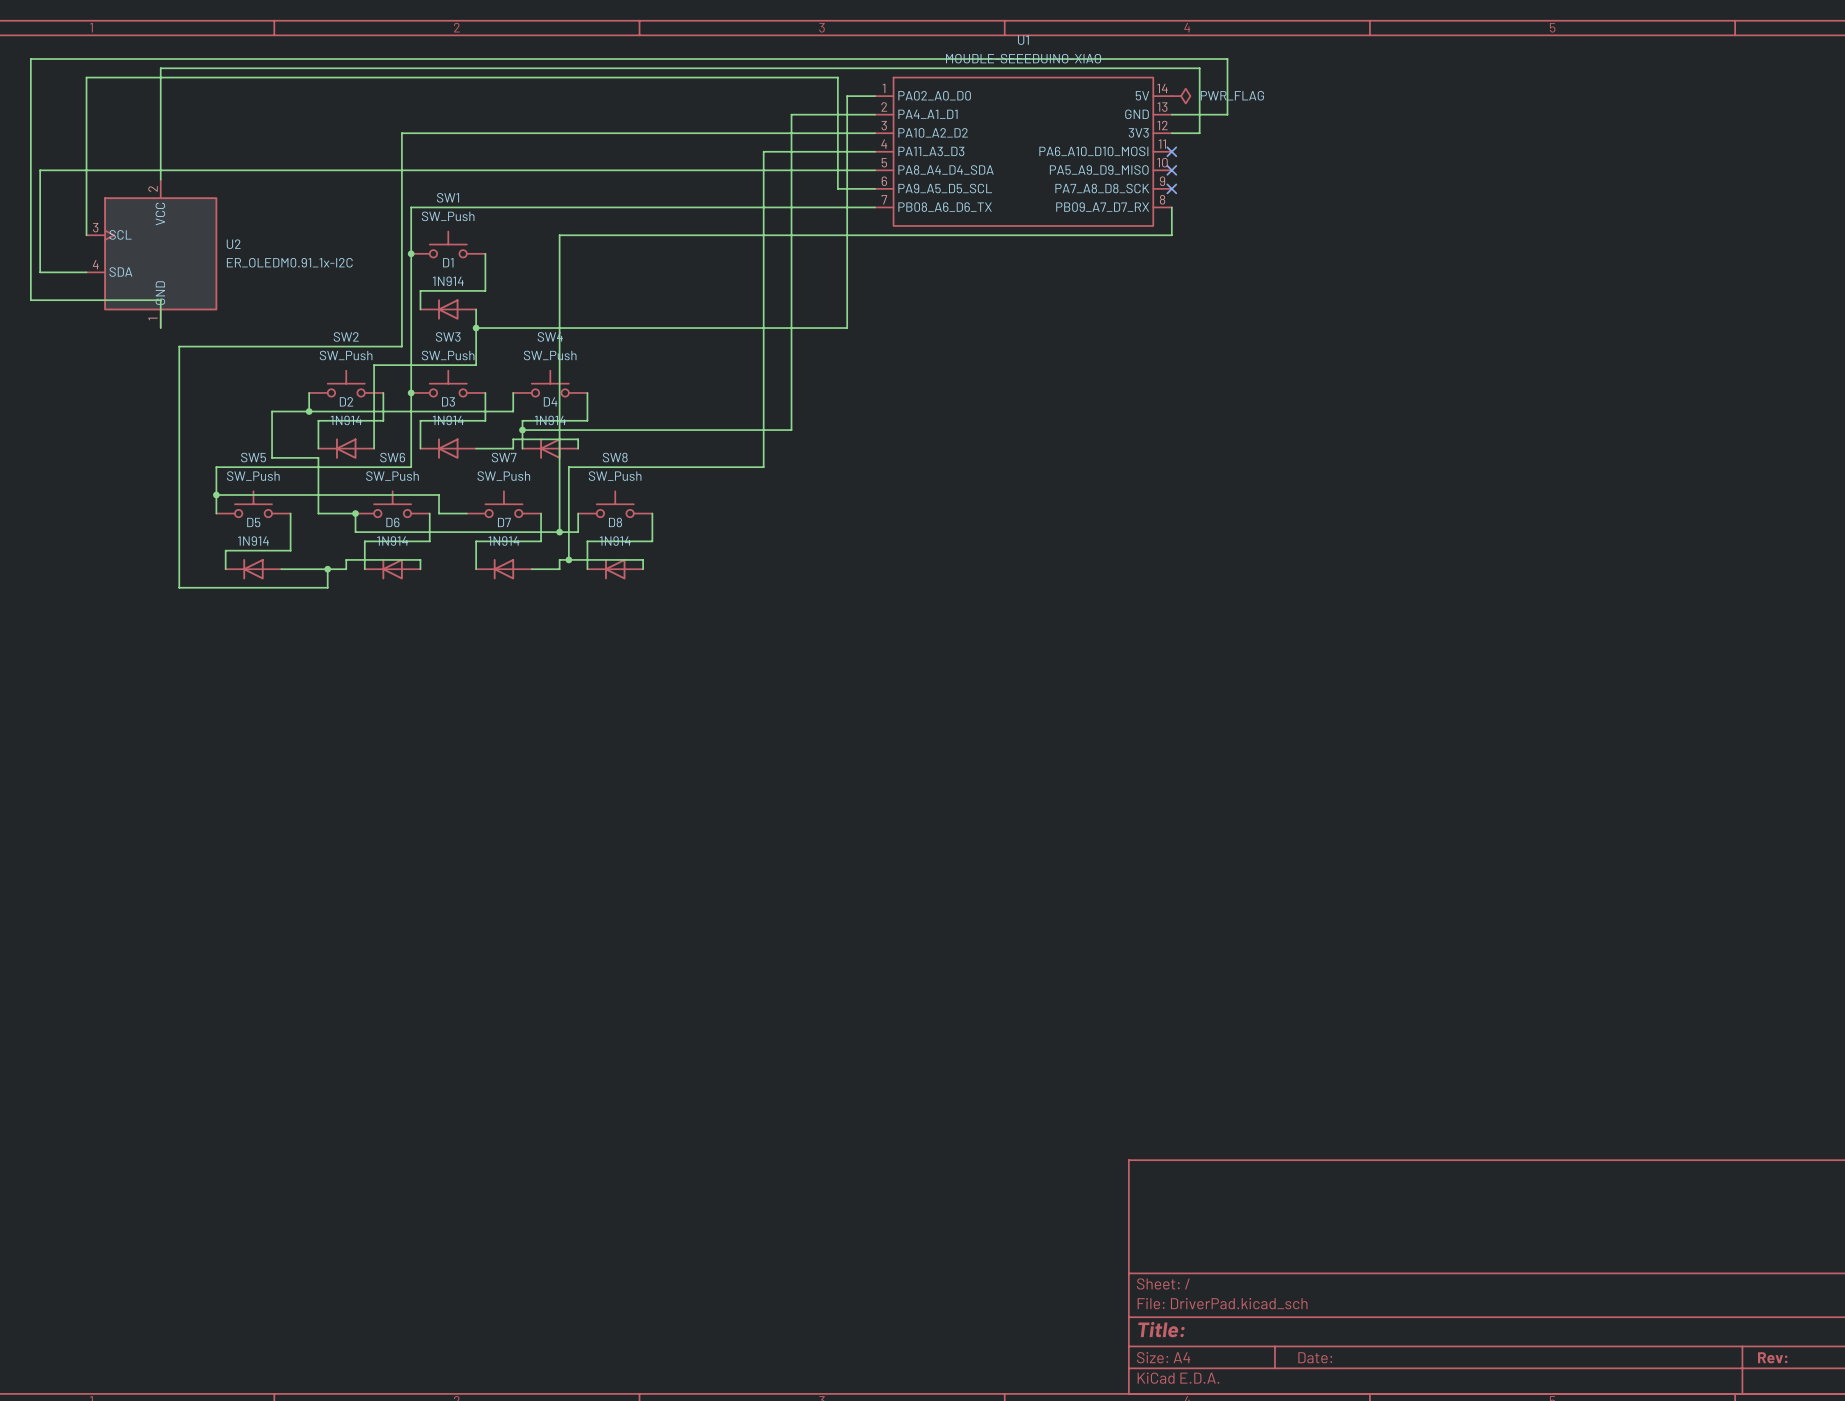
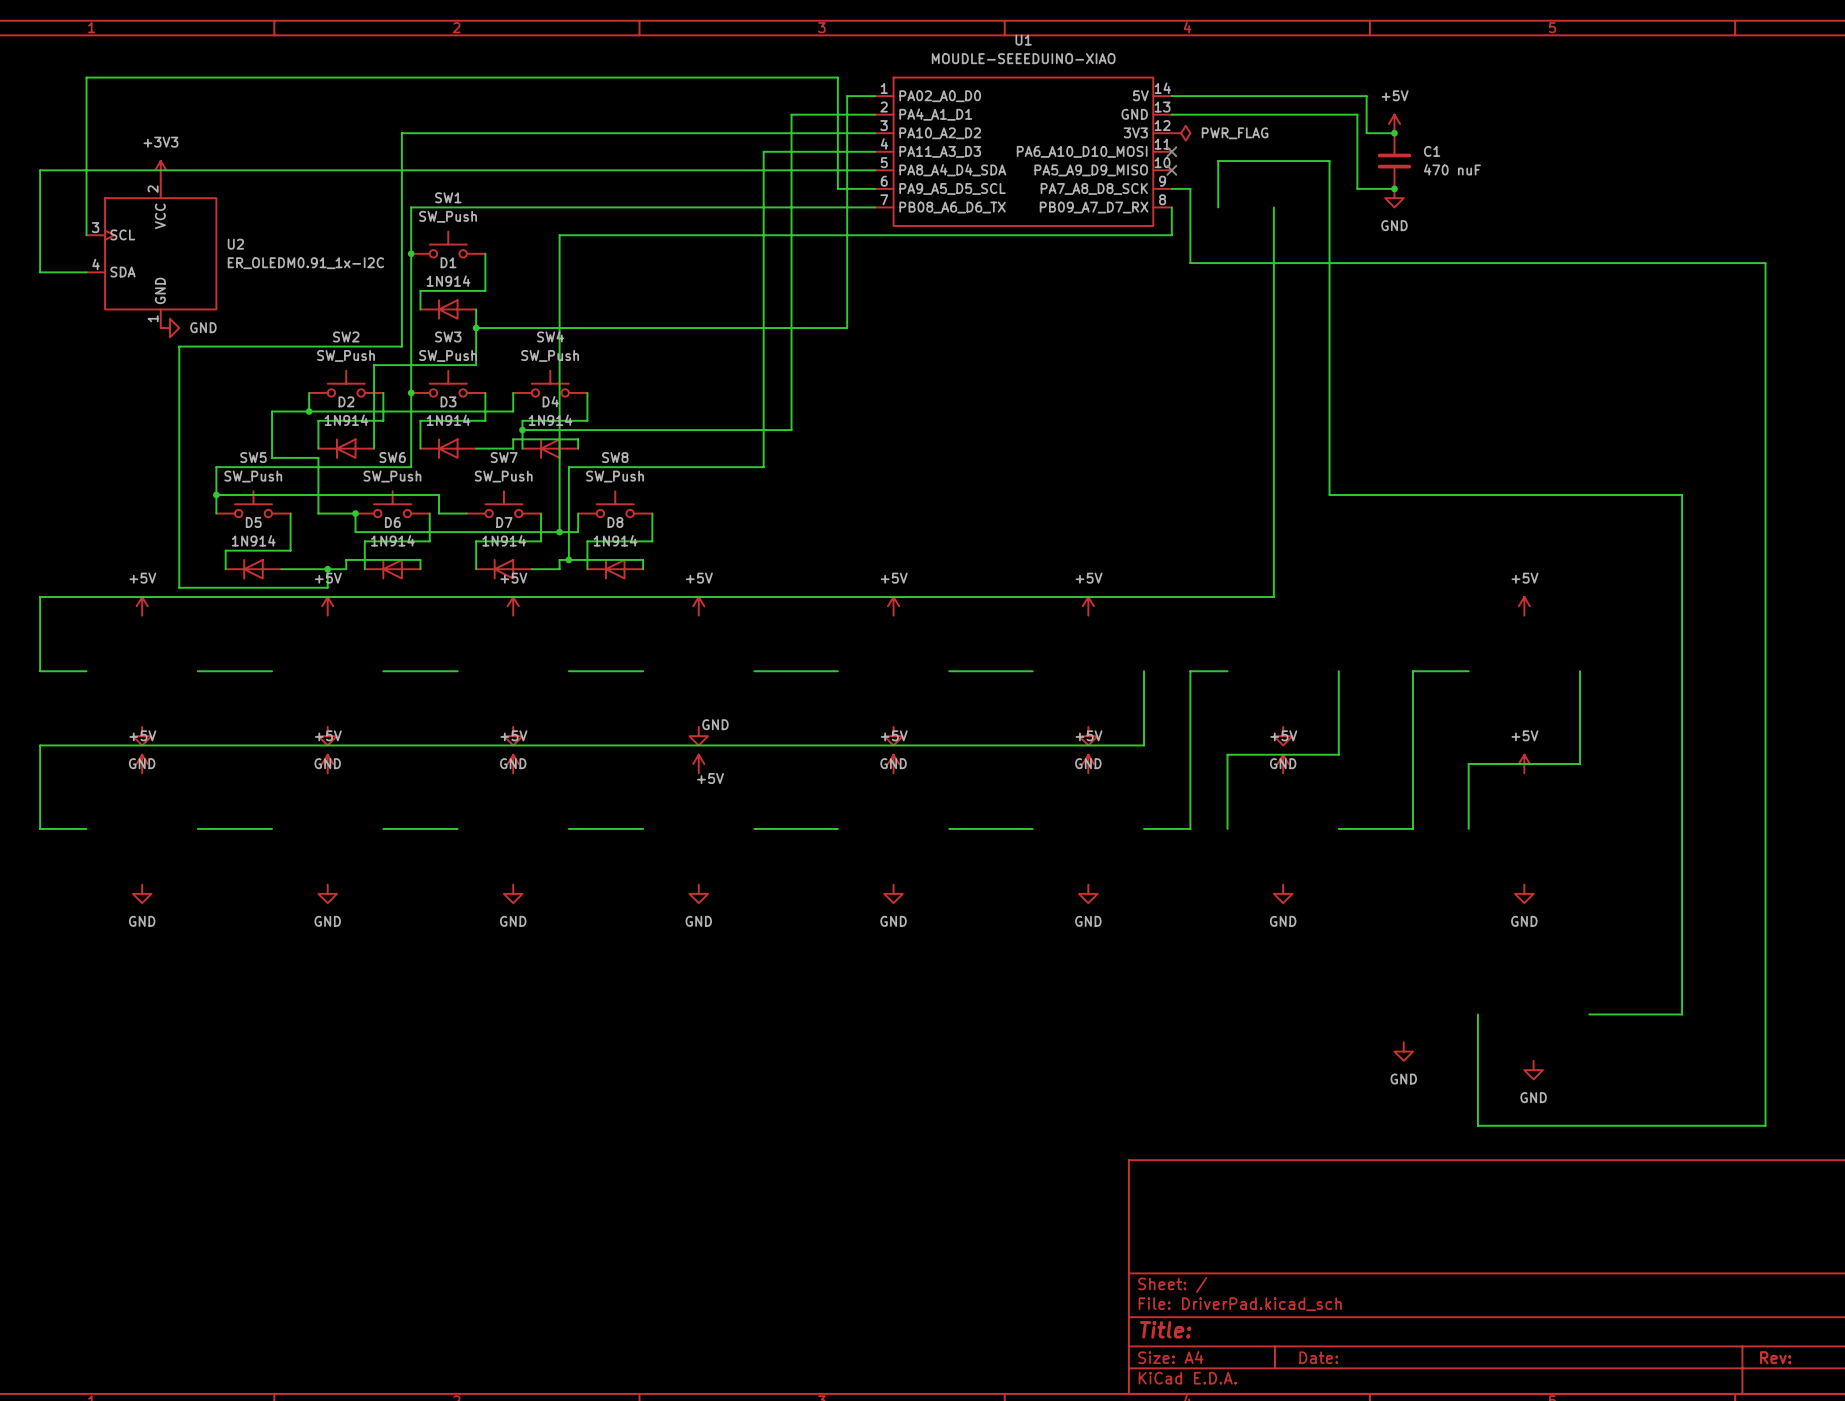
wire: none -> (1171, 96) (1366, 96) (1366, 133) (1394, 133)
power symbol position: PWR_FLAG (1181, 96) -> PWR_FLAG (1181, 133)
wire: (1227, 114) (1227, 59) (30, 59) (30, 300) (160, 300) (160, 328) -> (1227, 114) (1357, 114) (1357, 188) (1394, 188)
power symbol: none -> +5V (1394, 123)
wire: (1171, 133) (1199, 133) (1199, 68) (160, 68) (160, 179) -> none
junction: none -> (1394, 133)
C1: none -> 470 nuF (1394, 161)
power symbol: none -> +3V3 (160, 170)
wire: none -> (1171, 188) (1190, 188) (1190, 263) (1765, 263) (1765, 1125) (1477, 1125) (1477, 1014)
no-connect mark: (1171, 188) -> none
junction: none -> (1394, 188)
power symbol: none -> GND (1394, 198)
wire: none -> (1218, 207) (1218, 161) (1329, 161) (1329, 495) (1682, 495) (1682, 1014) (1589, 1014)
wire: none -> (1273, 207) (1273, 597) (40, 597) (40, 671) (86, 671)
power symbol: none -> GND (170, 328)
power symbol: none -> +5V (142, 606)
power symbol: none -> +5V (327, 606)
power symbol: none -> +5V (513, 606)
power symbol: none -> +5V (698, 606)
power symbol: none -> +5V (893, 606)
power symbol: none -> +5V (1088, 606)
power symbol: none -> +5V (1524, 606)
wire: none -> (197, 671) (272, 671)
wire: none -> (383, 671) (457, 671)
wire: none -> (568, 671) (643, 671)
wire: none -> (754, 671) (837, 671)
wire: none -> (949, 671) (1032, 671)
wire: none -> (1144, 671) (1144, 745) (40, 745) (40, 828) (86, 828)
wire: none -> (1227, 671) (1190, 671) (1190, 828) (1144, 828)
wire: none -> (1338, 671) (1338, 754) (1227, 754) (1227, 828)
wire: none -> (1468, 671) (1413, 671) (1413, 828) (1338, 828)
wire: none -> (1579, 671) (1579, 764) (1468, 764) (1468, 828)
power symbol: none -> GND (142, 736)
power symbol: none -> GND (327, 736)
power symbol: none -> GND (513, 736)
power symbol: none -> GND (698, 736)
power symbol: none -> GND (893, 736)
power symbol: none -> GND (1088, 736)
power symbol: none -> GND (1283, 736)
power symbol: none -> +5V (142, 764)
power symbol: none -> +5V (327, 764)
power symbol: none -> +5V (513, 764)
power symbol: none -> +5V (698, 764)
power symbol: none -> +5V (893, 764)
power symbol: none -> +5V (1088, 764)
power symbol: none -> +5V (1283, 764)
power symbol: none -> +5V (1524, 764)
wire: none -> (197, 828) (272, 828)
wire: none -> (383, 828) (457, 828)
wire: none -> (568, 828) (643, 828)
wire: none -> (754, 828) (837, 828)
wire: none -> (949, 828) (1032, 828)
power symbol: none -> GND (142, 893)
power symbol: none -> GND (327, 893)
power symbol: none -> GND (513, 893)
power symbol: none -> GND (698, 893)
power symbol: none -> GND (893, 893)
power symbol: none -> GND (1088, 893)
power symbol: none -> GND (1283, 893)
power symbol: none -> GND (1524, 893)
power symbol: none -> GND (1403, 1051)
power symbol: none -> GND (1533, 1070)

